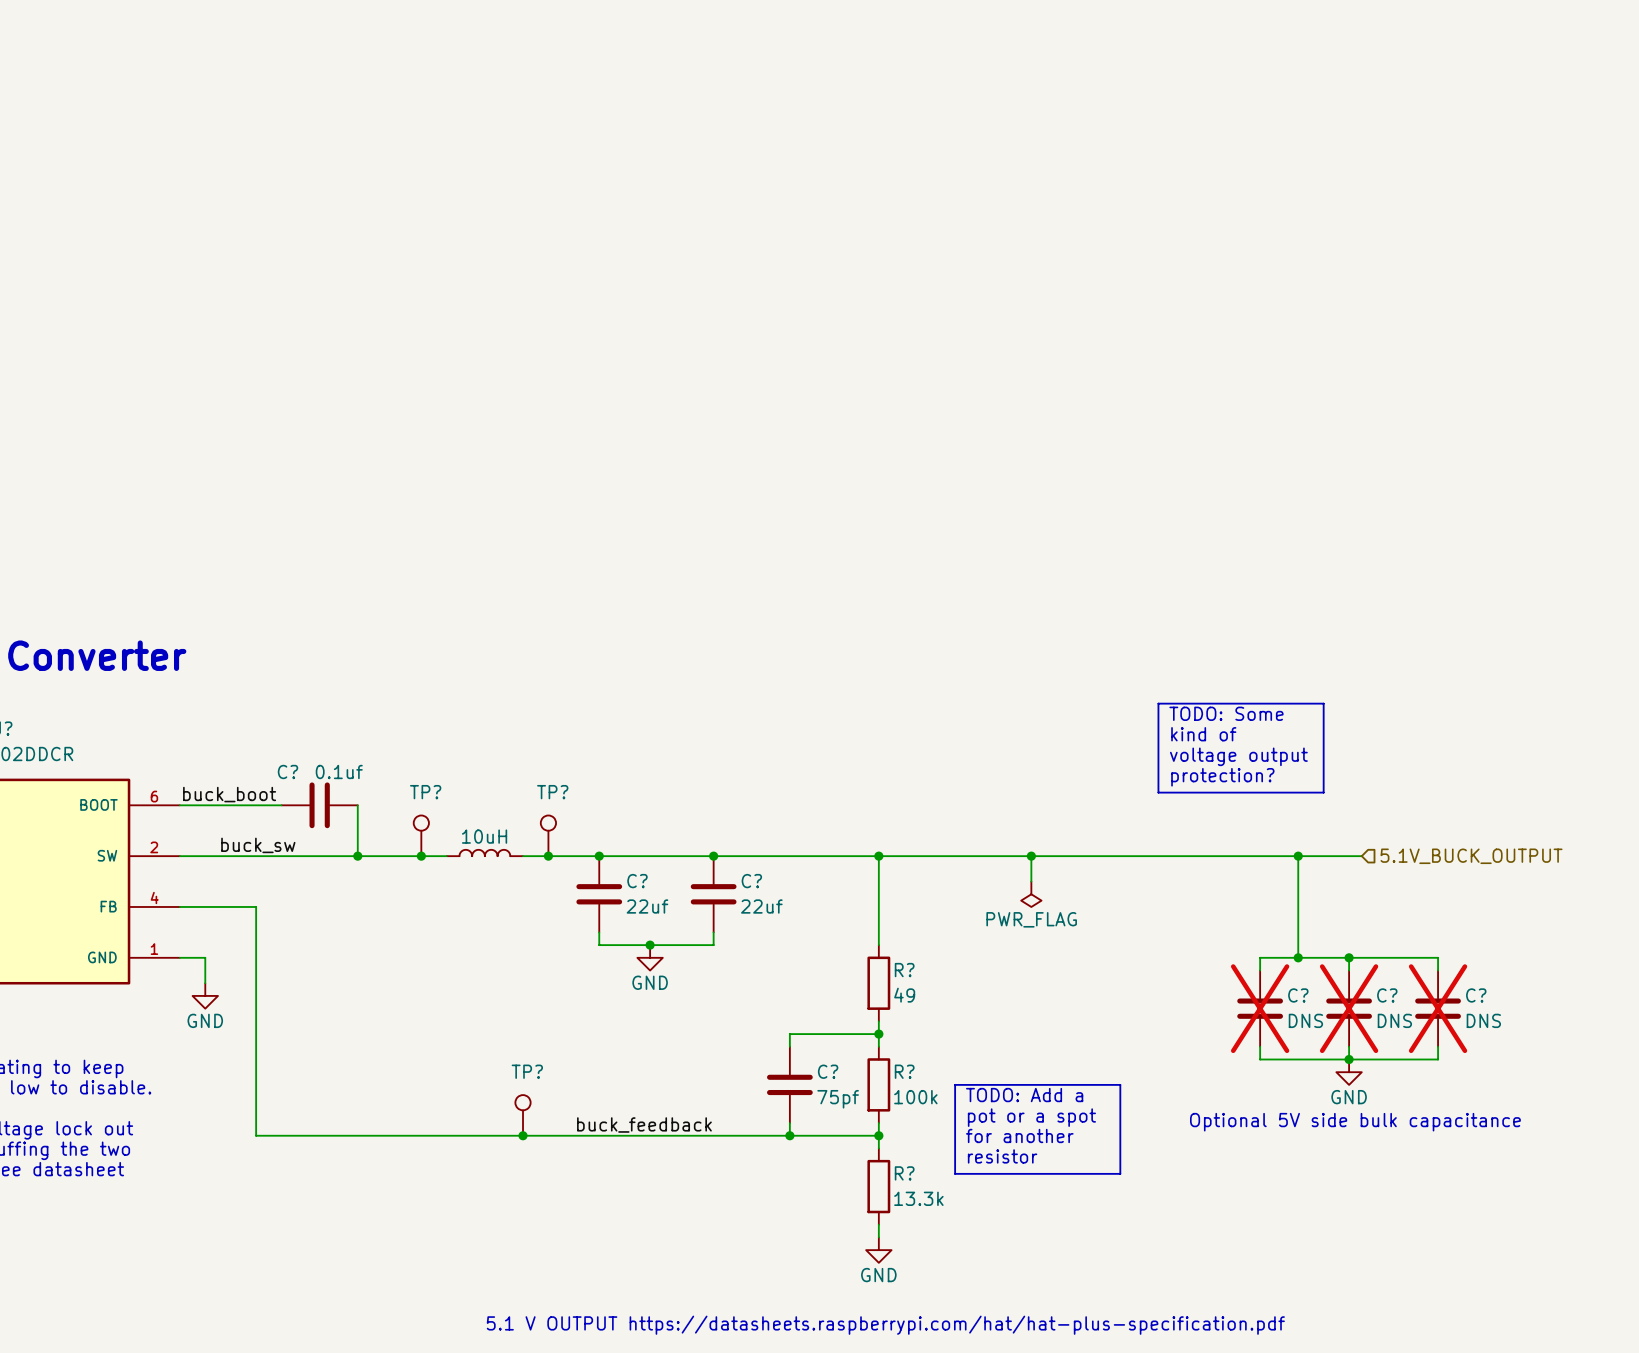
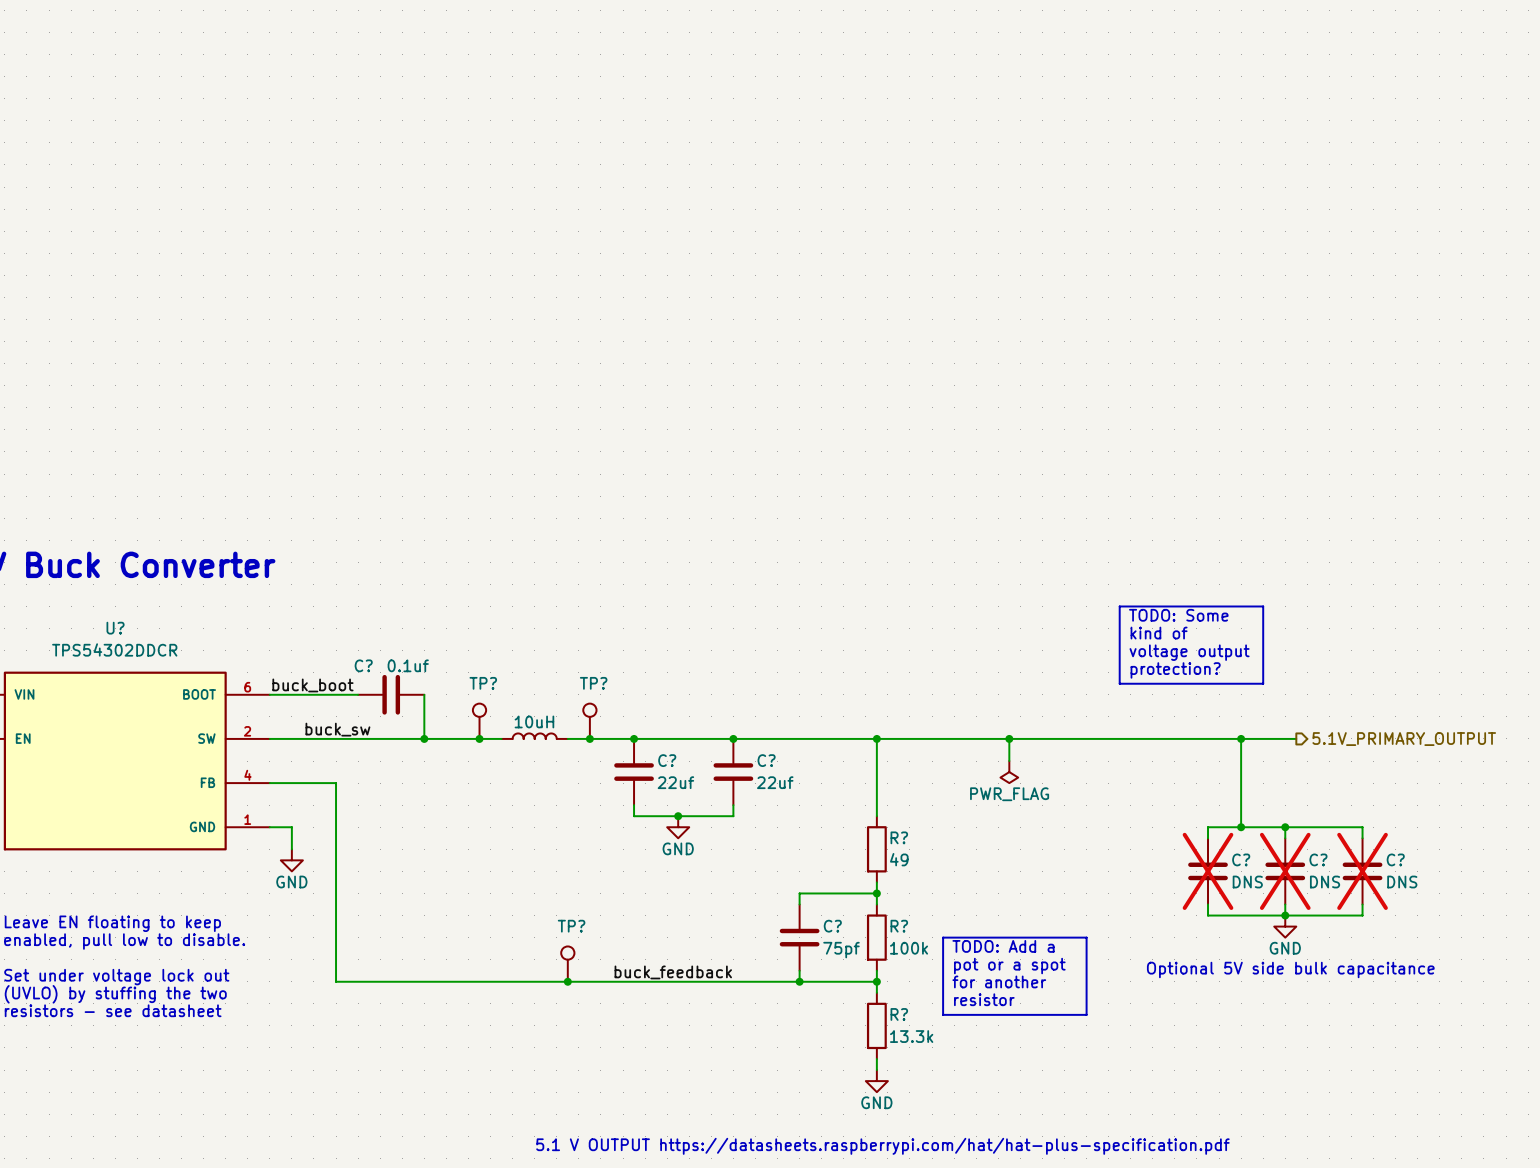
hierarchical label shape: input (1471, 856) -> output (1404, 739)
hierarchical label: 5.1V_BUCK_OUTPUT (1471, 856) -> 5.1V_PRIMARY_OUTPUT (1404, 739)

